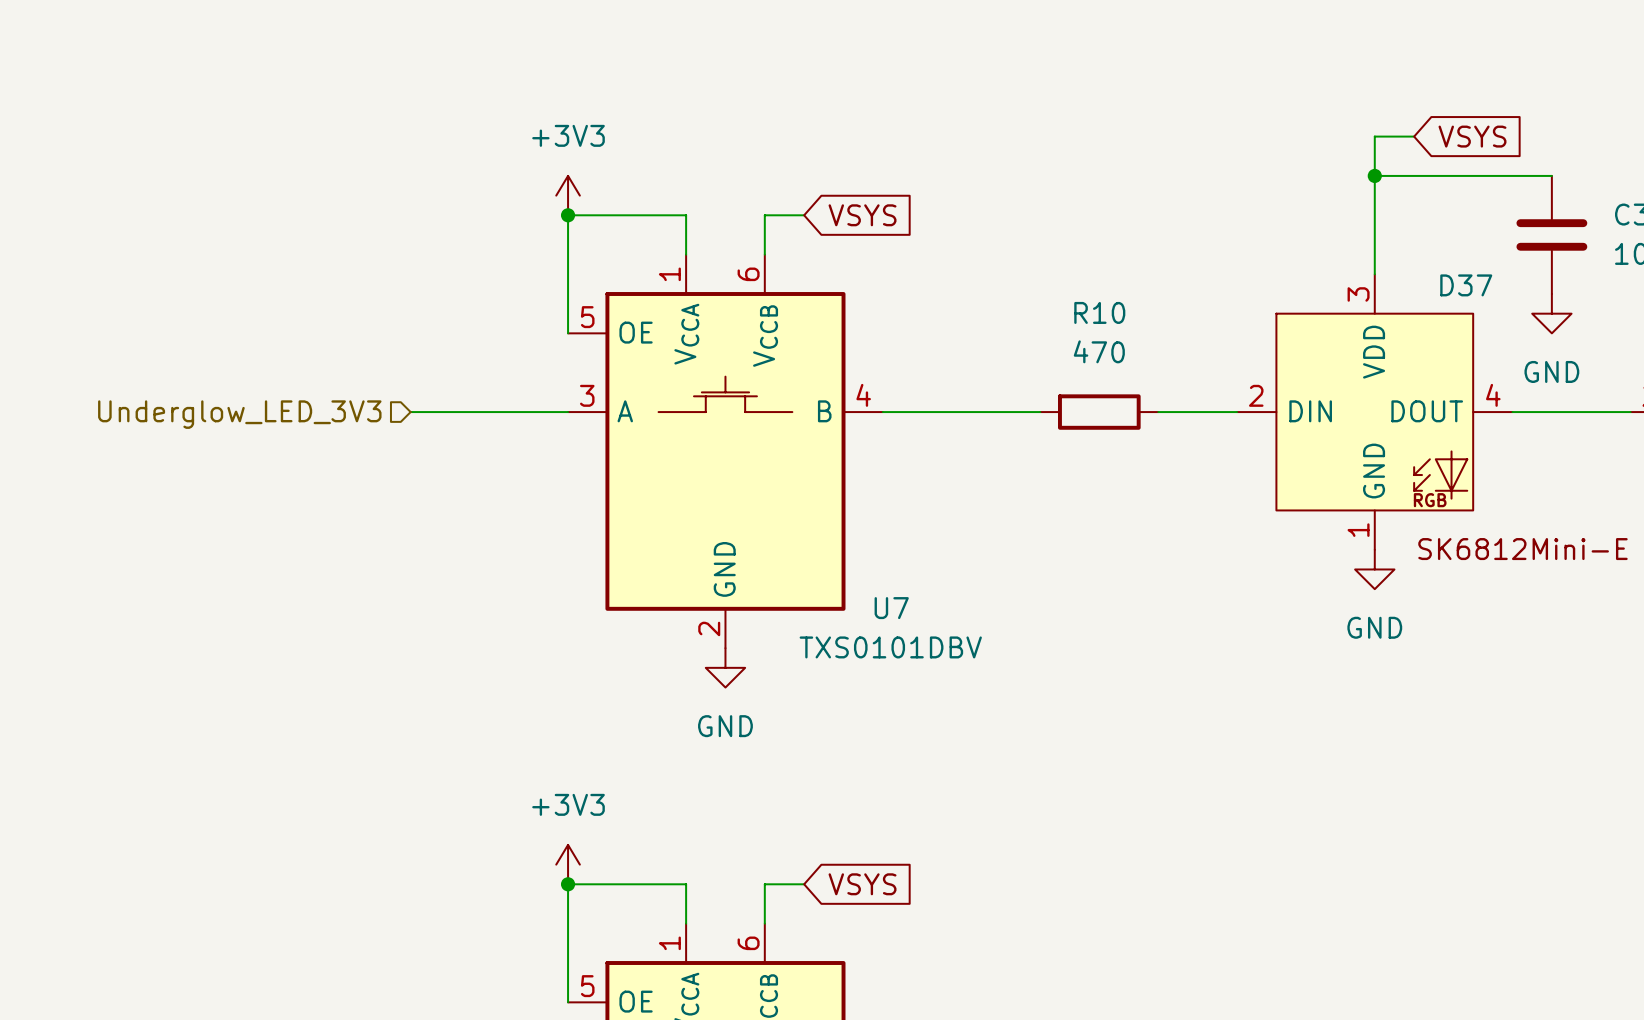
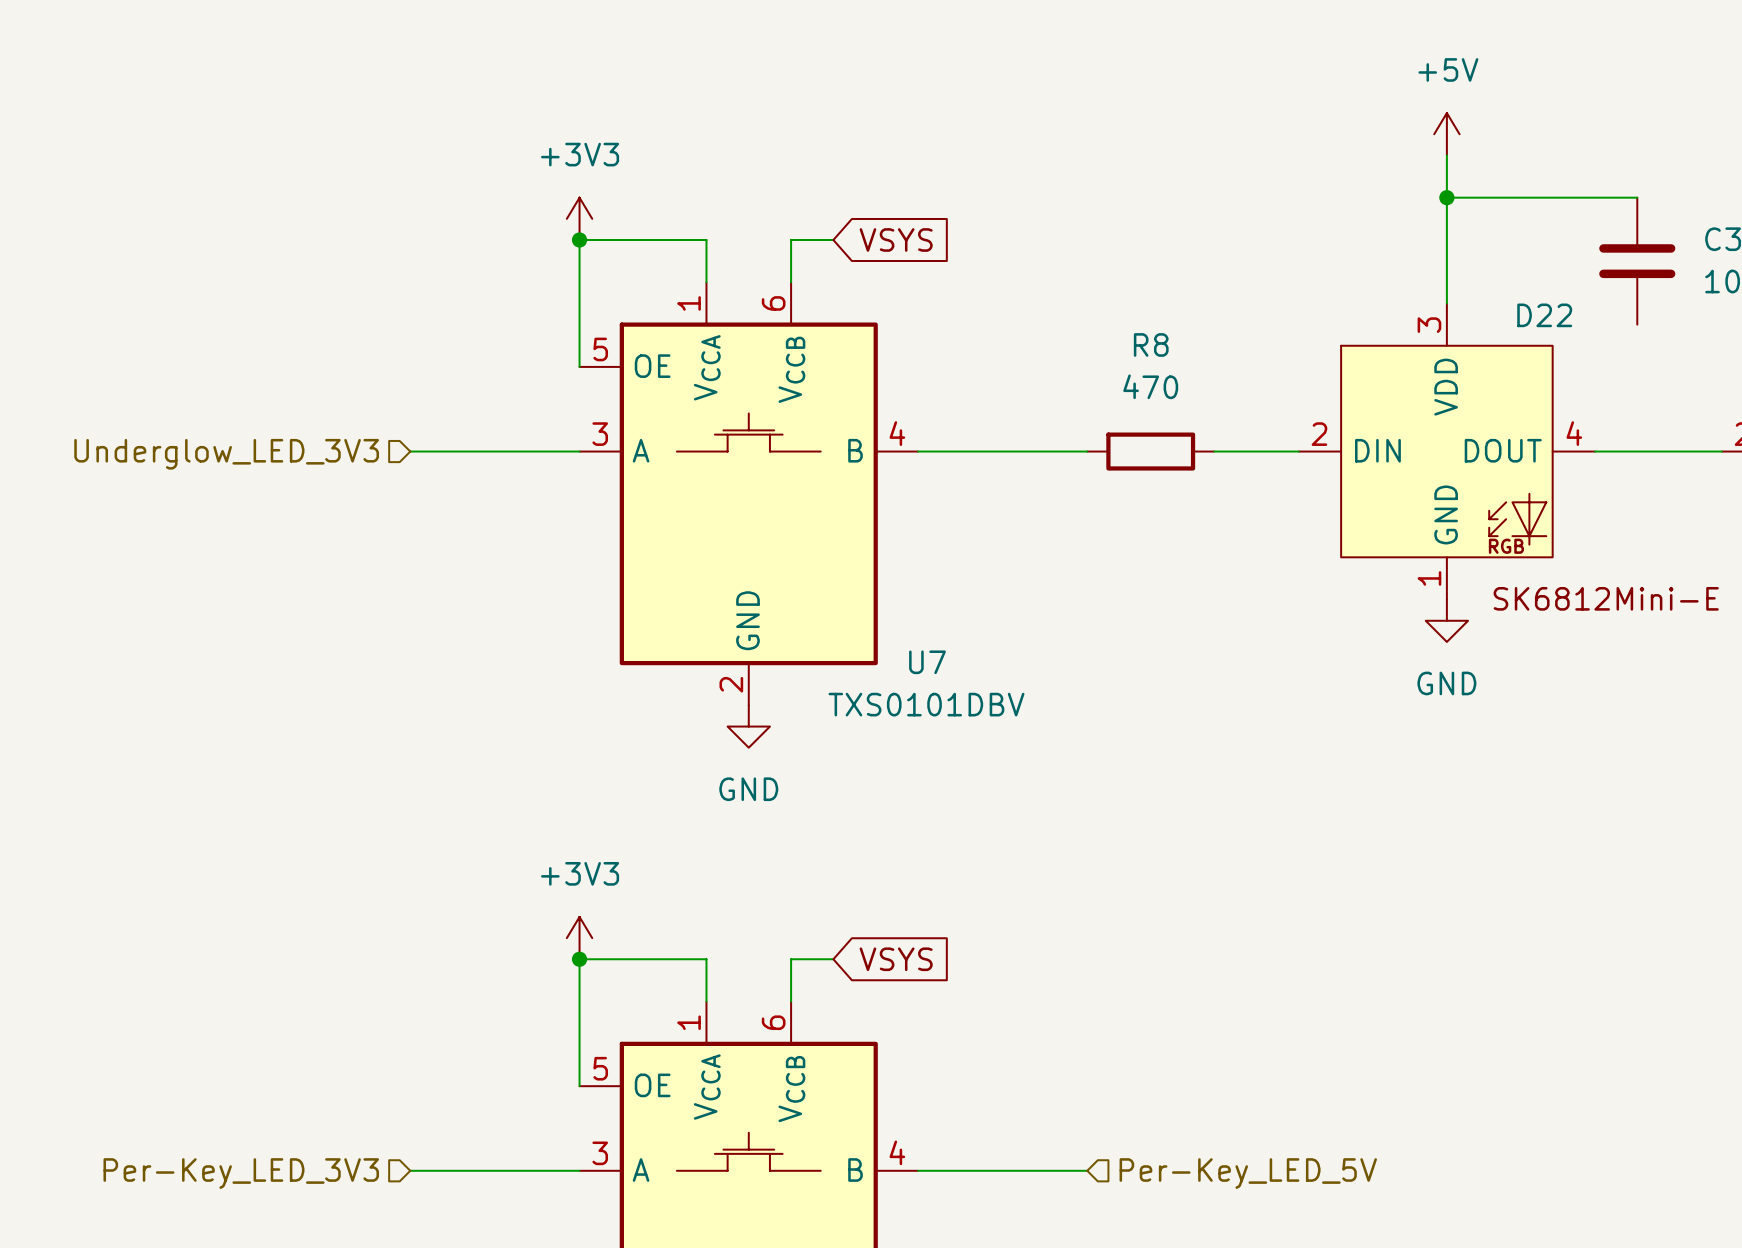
power symbol: none -> +5V (1446, 134)
wire: (1374, 136) (1414, 136) -> none
global label: VSYS (1472, 136) -> none
D37 name: D37 (1466, 285) -> D22 (1544, 315)
R10 name: R10 (1099, 312) -> R8 (1151, 344)
power symbol: GND (1551, 313) -> none

